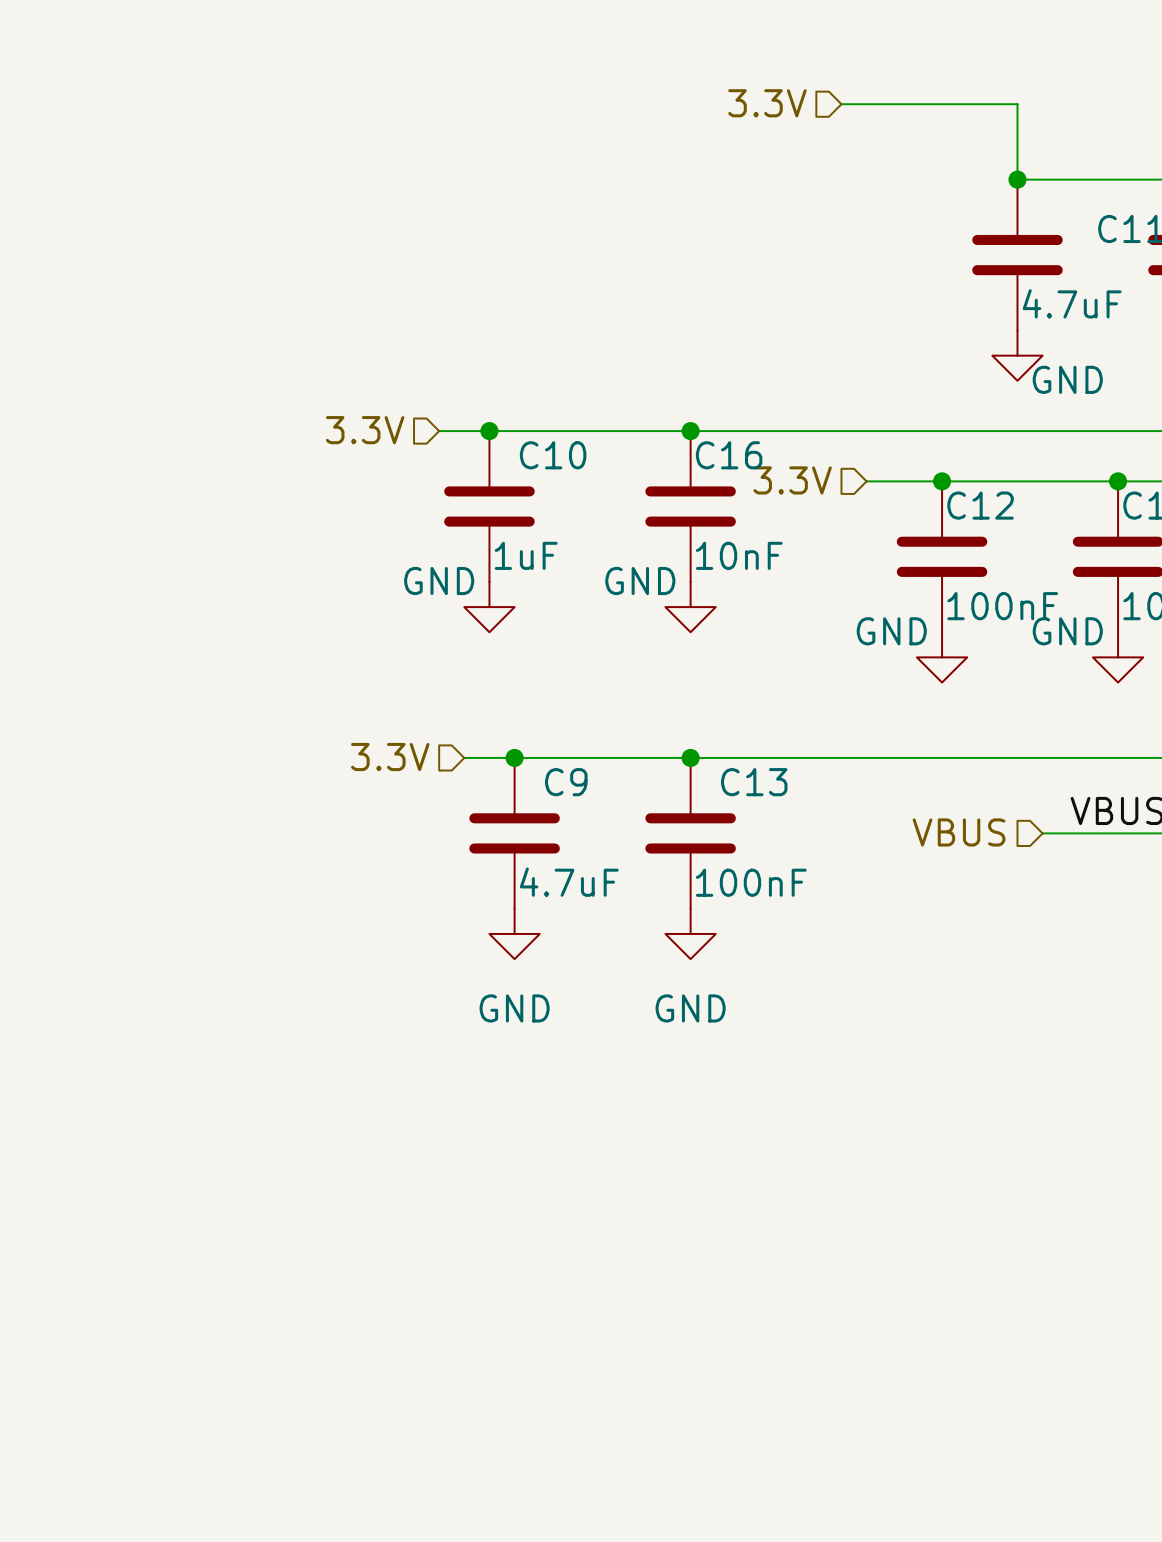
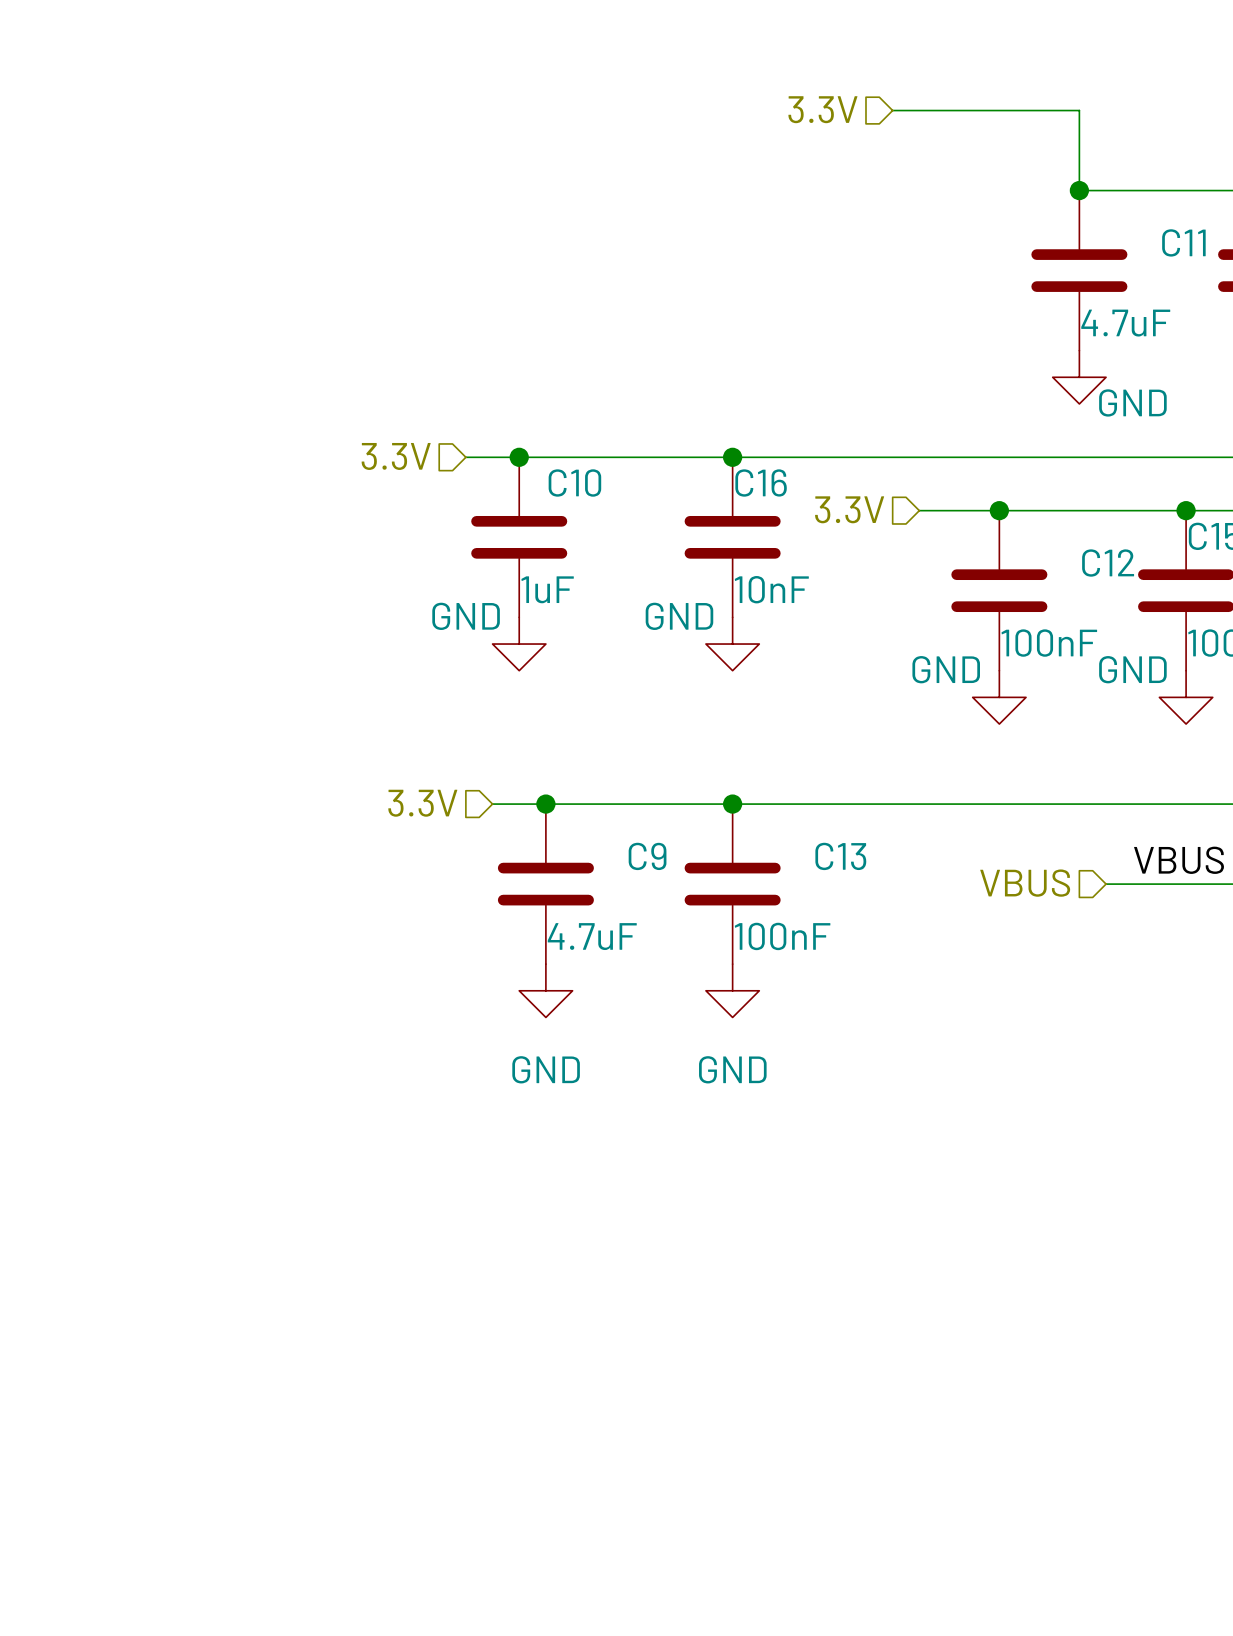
C12 name position: C12 (980, 505) -> C12 (1108, 563)
C9 name position: C9 (566, 782) -> C9 (647, 856)
C13 name position: C13 (754, 782) -> C13 (840, 856)

